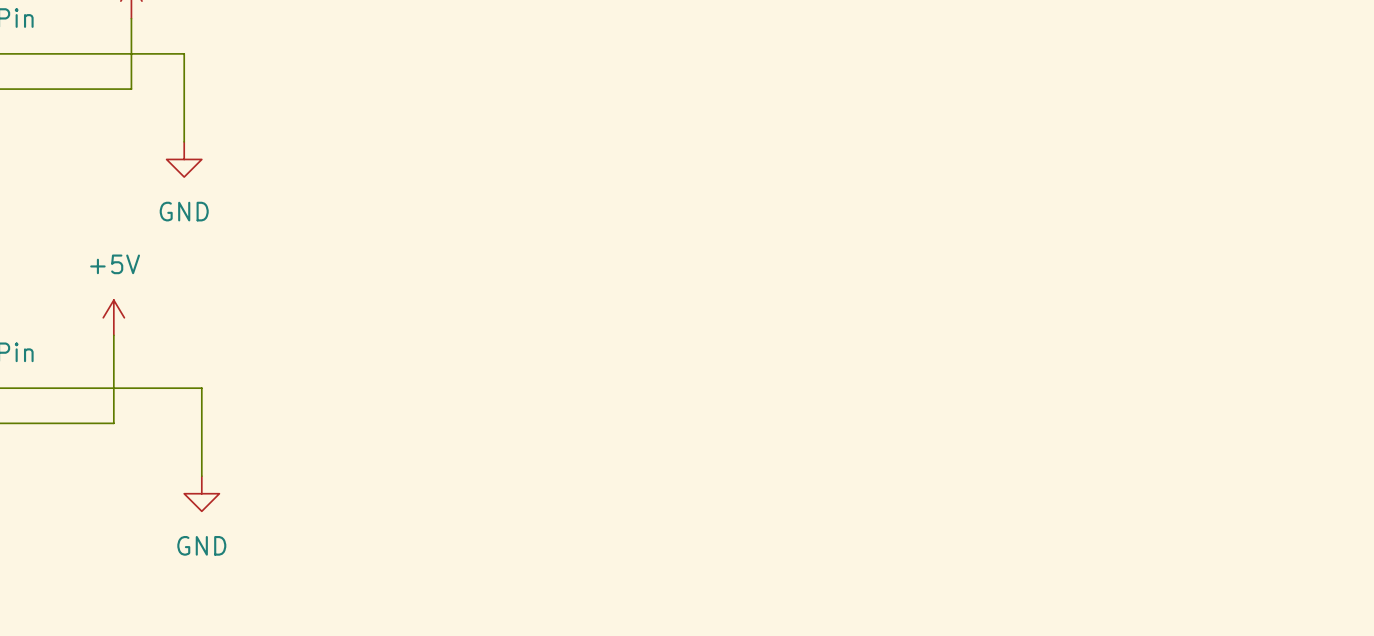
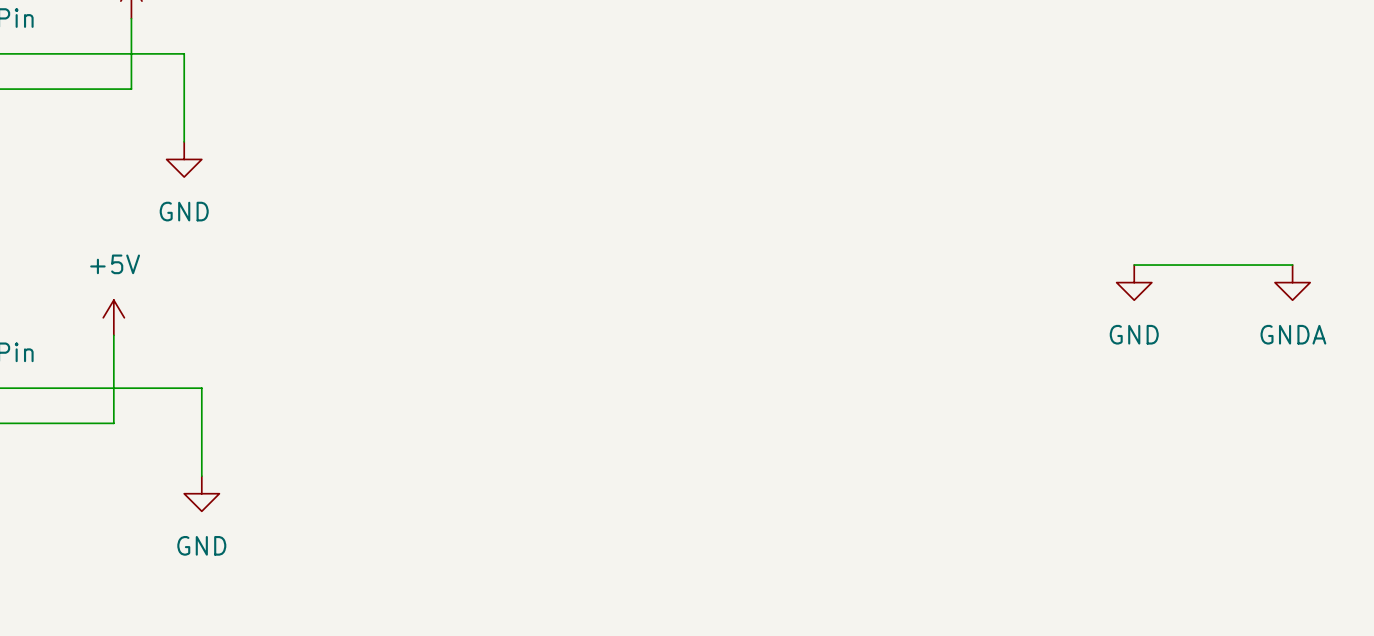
wire: none -> (1134, 265) (1292, 265)
power symbol: none -> GND (1134, 282)
power symbol: none -> GNDA (1292, 282)

